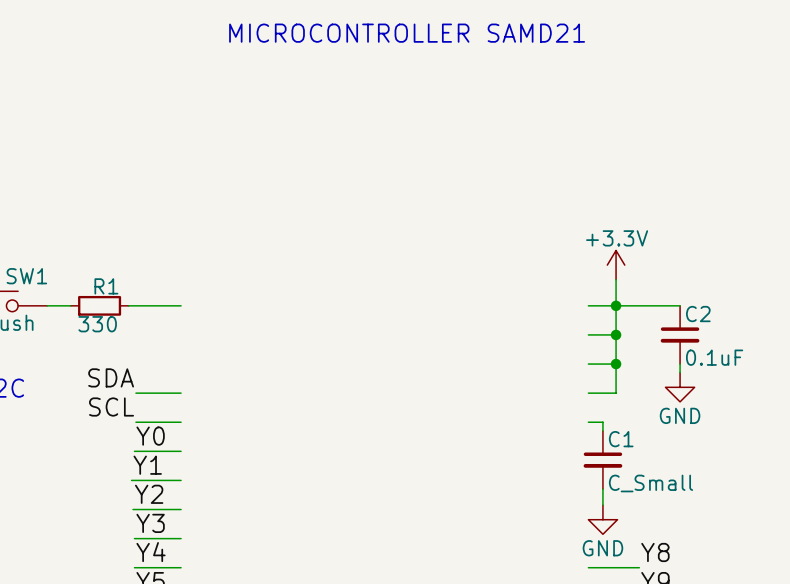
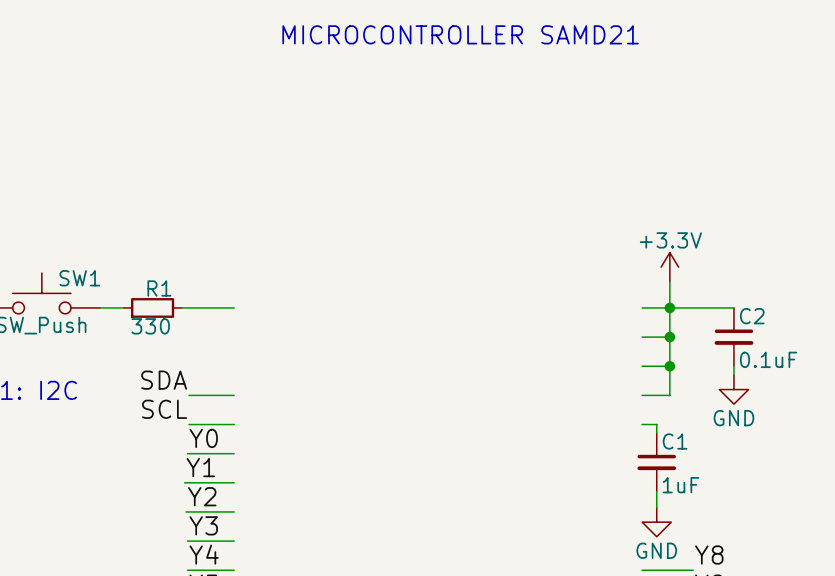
C1 value: C_Small (651, 483) -> 1uF (680, 485)

